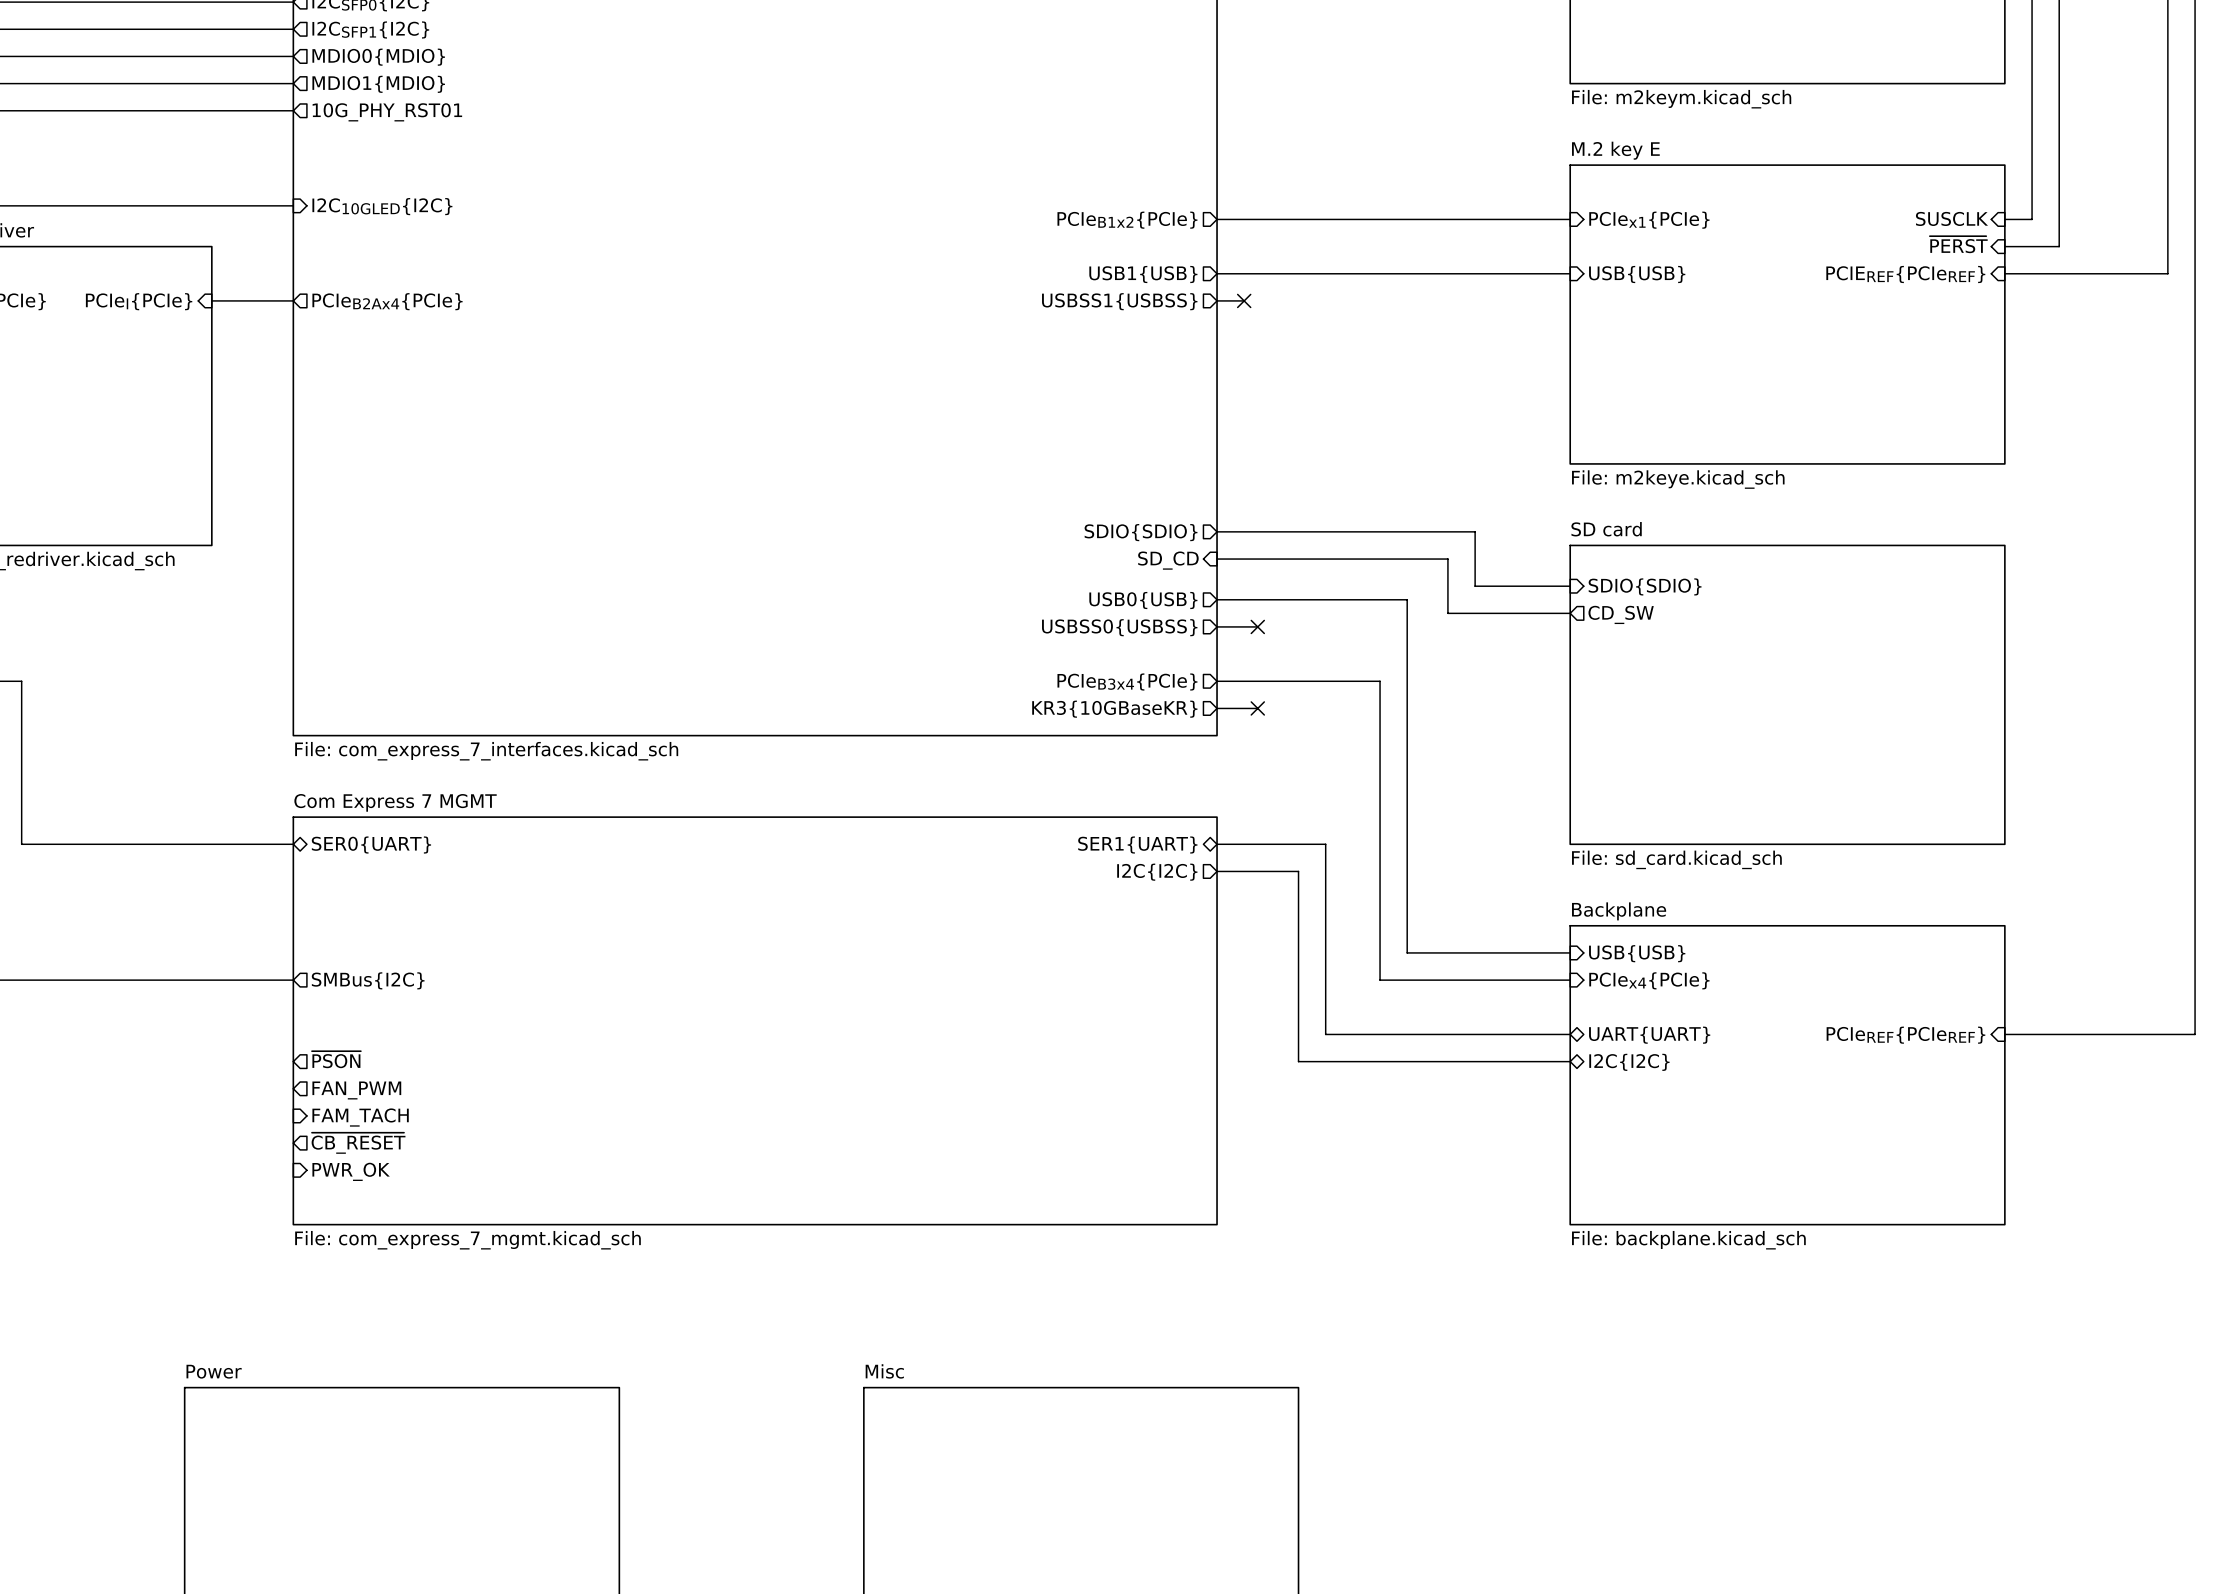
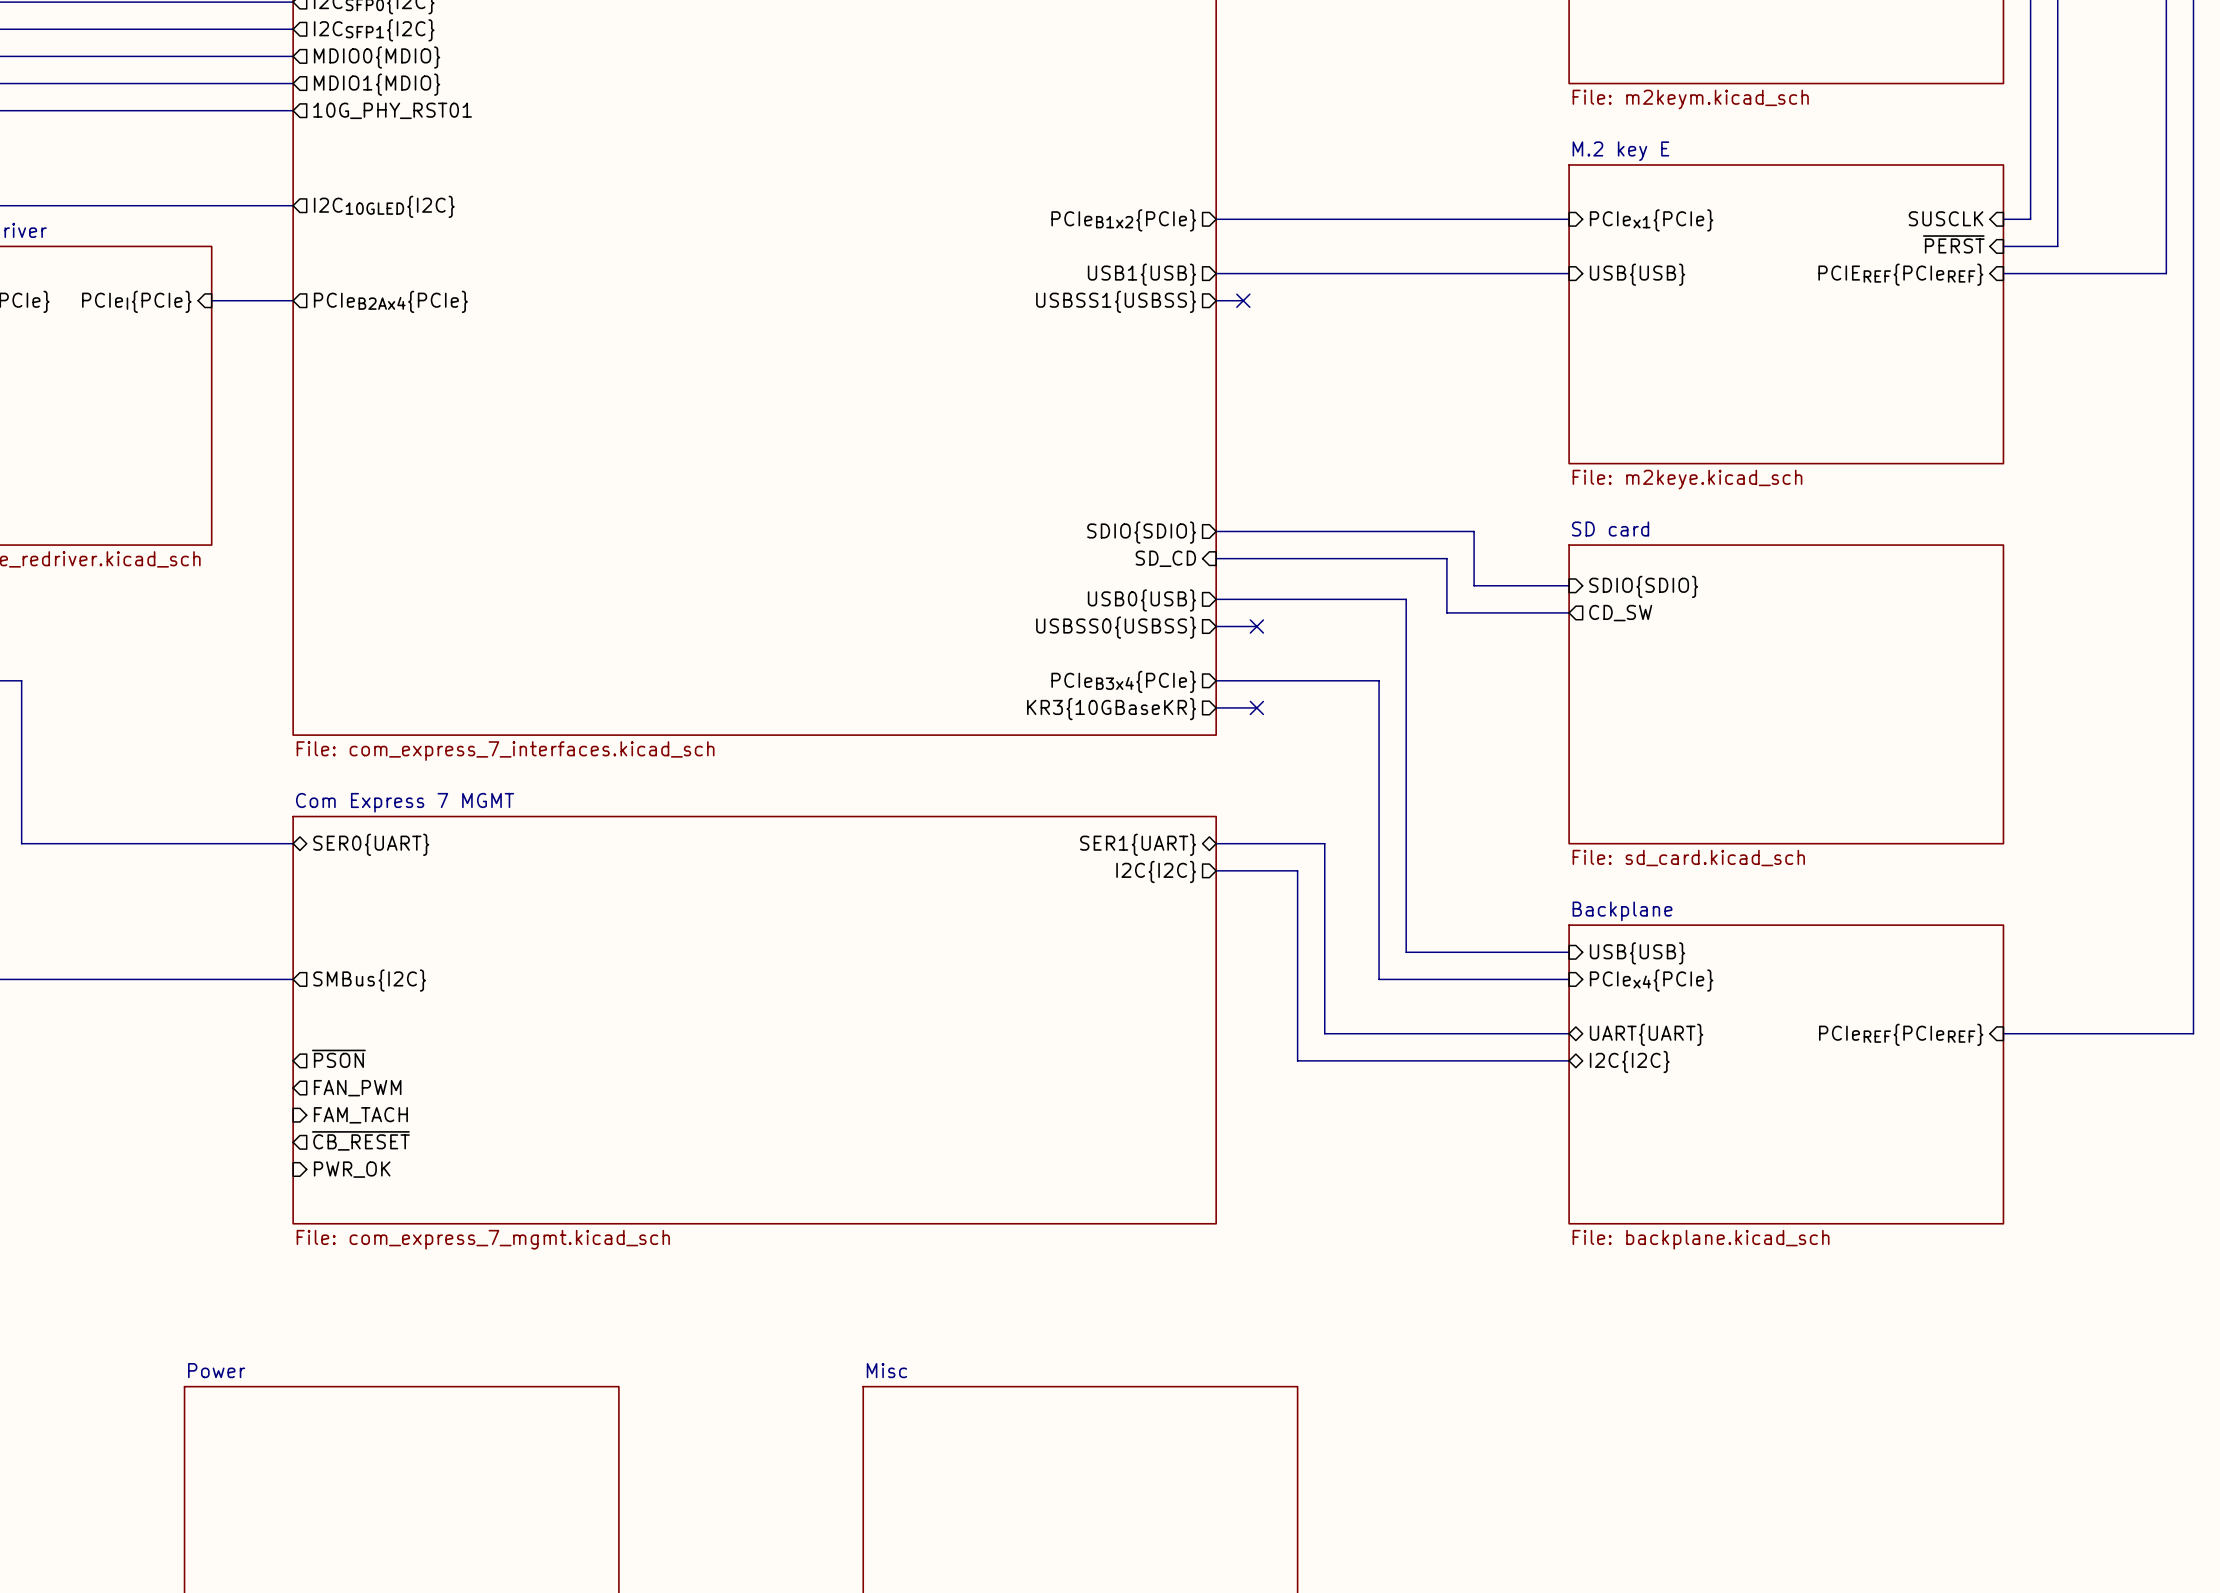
sheet pin shape: input (382, 206) -> output (384, 206)

